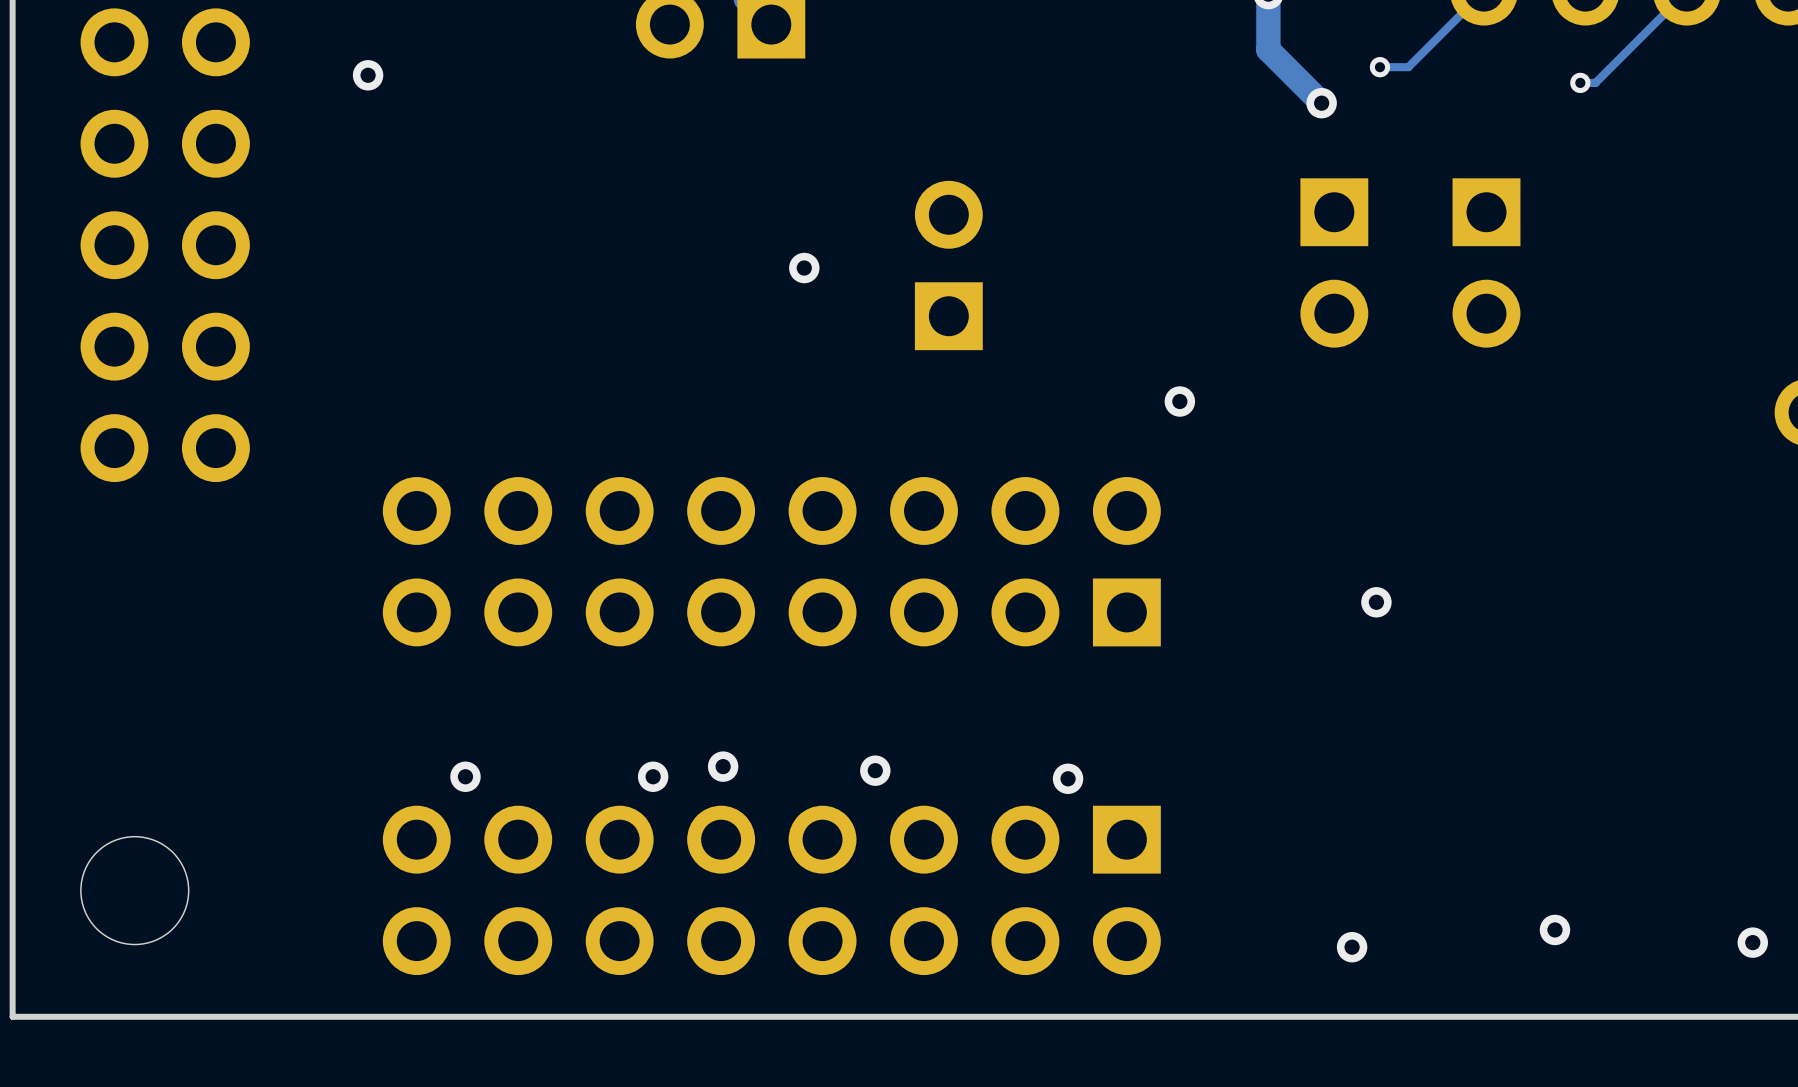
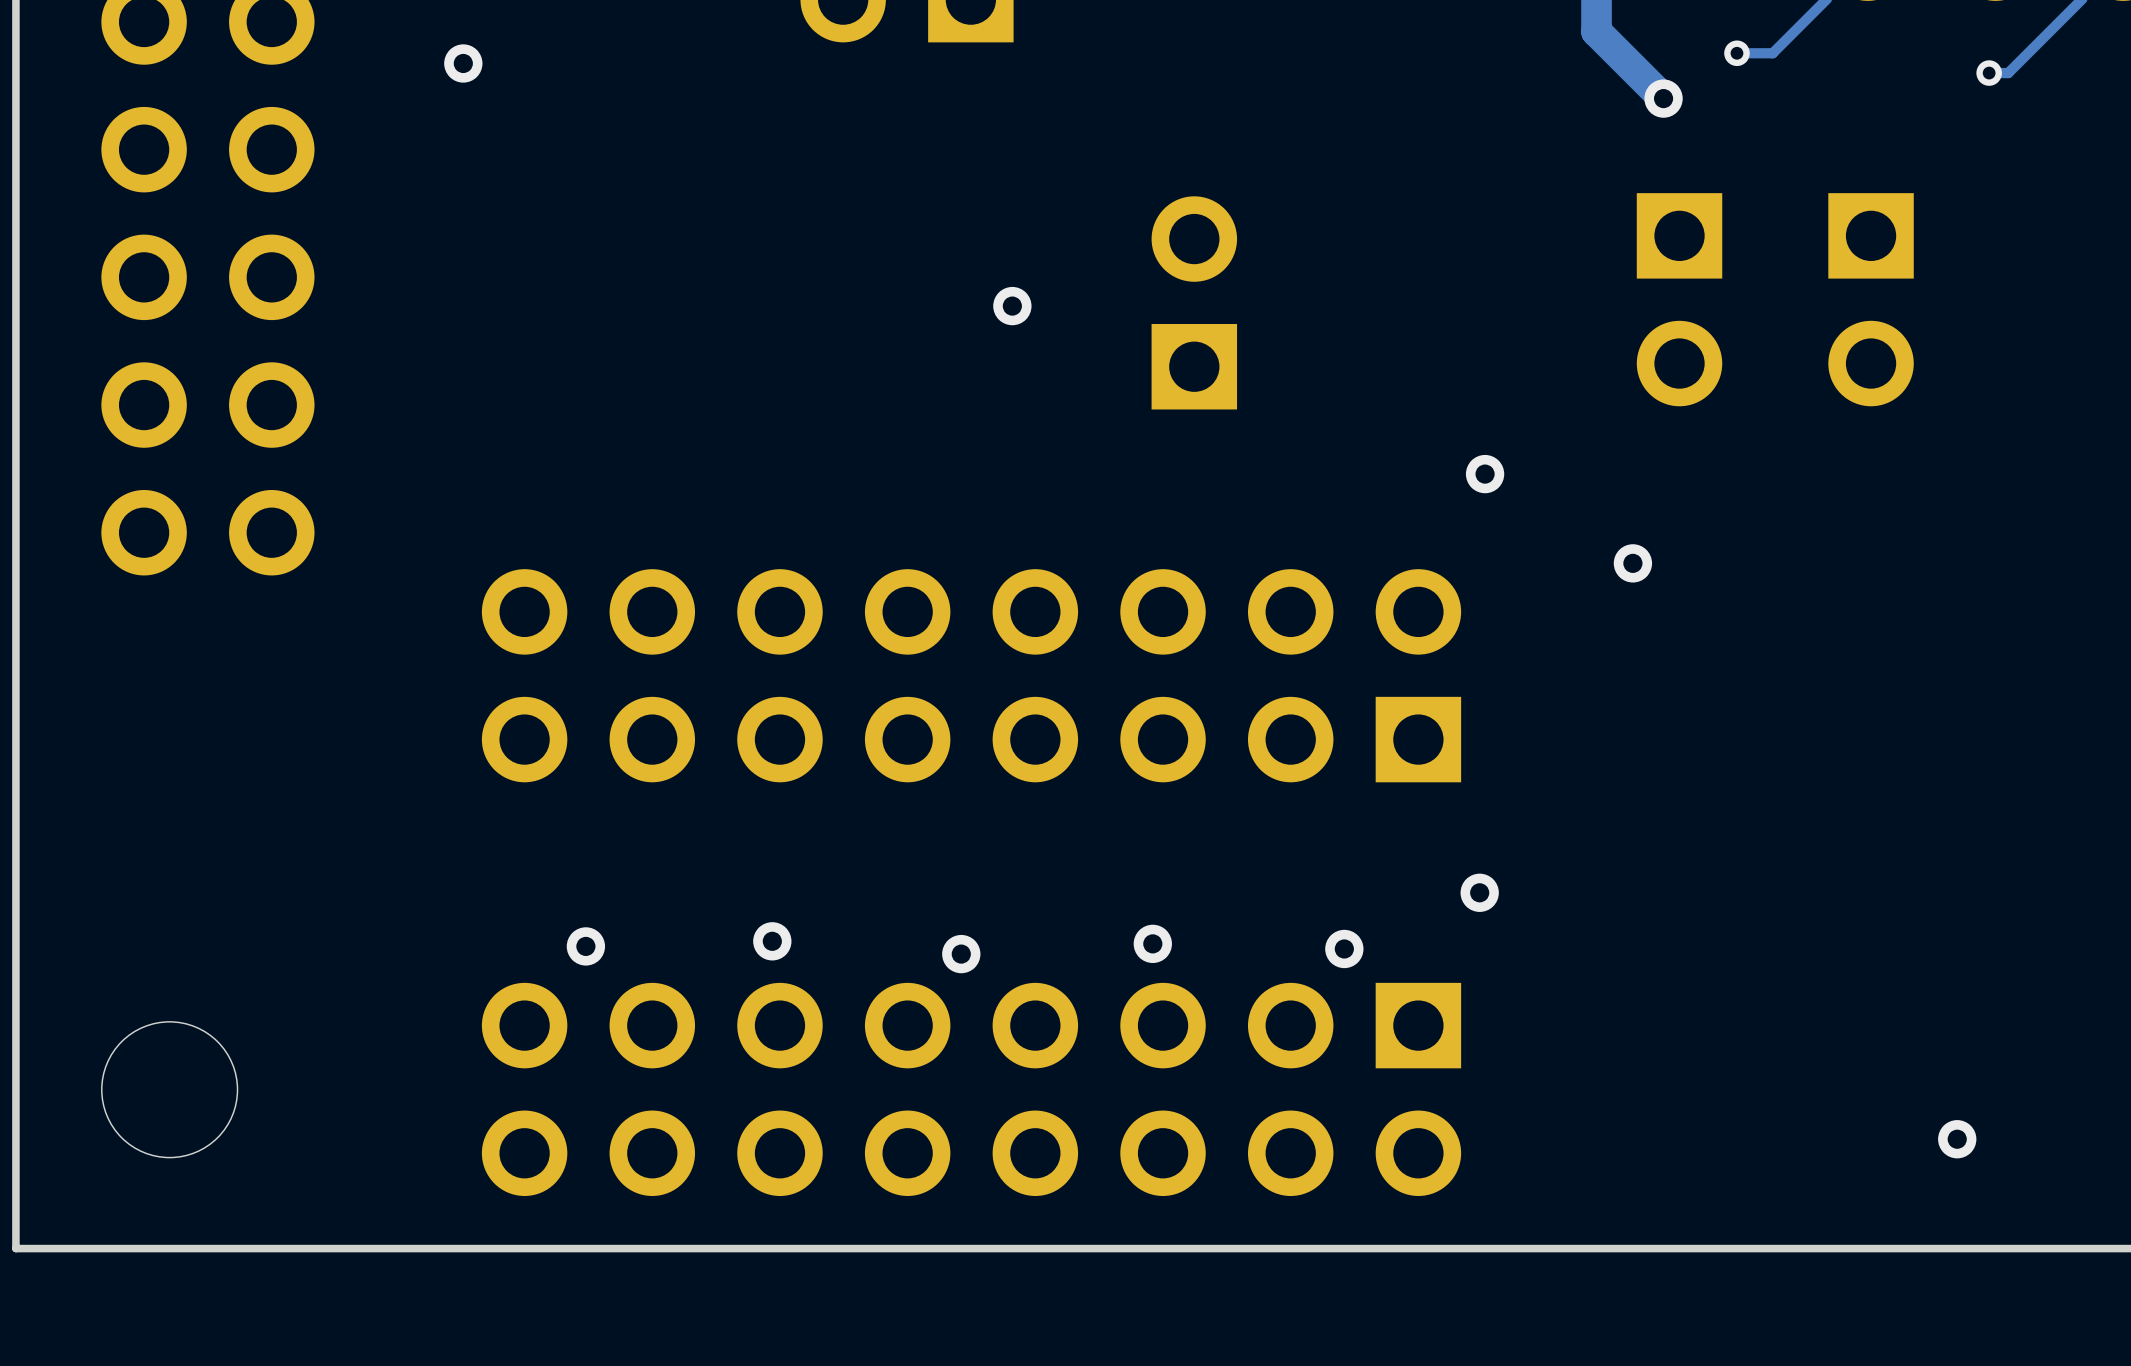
via: none -> (1632, 563)
via: (1376, 602) -> none
via: none -> (1479, 892)
via position: (723, 766) -> (961, 954)
via position: (875, 770) -> (1152, 943)
via position: (653, 776) -> (772, 941)
via: (1352, 947) -> none

